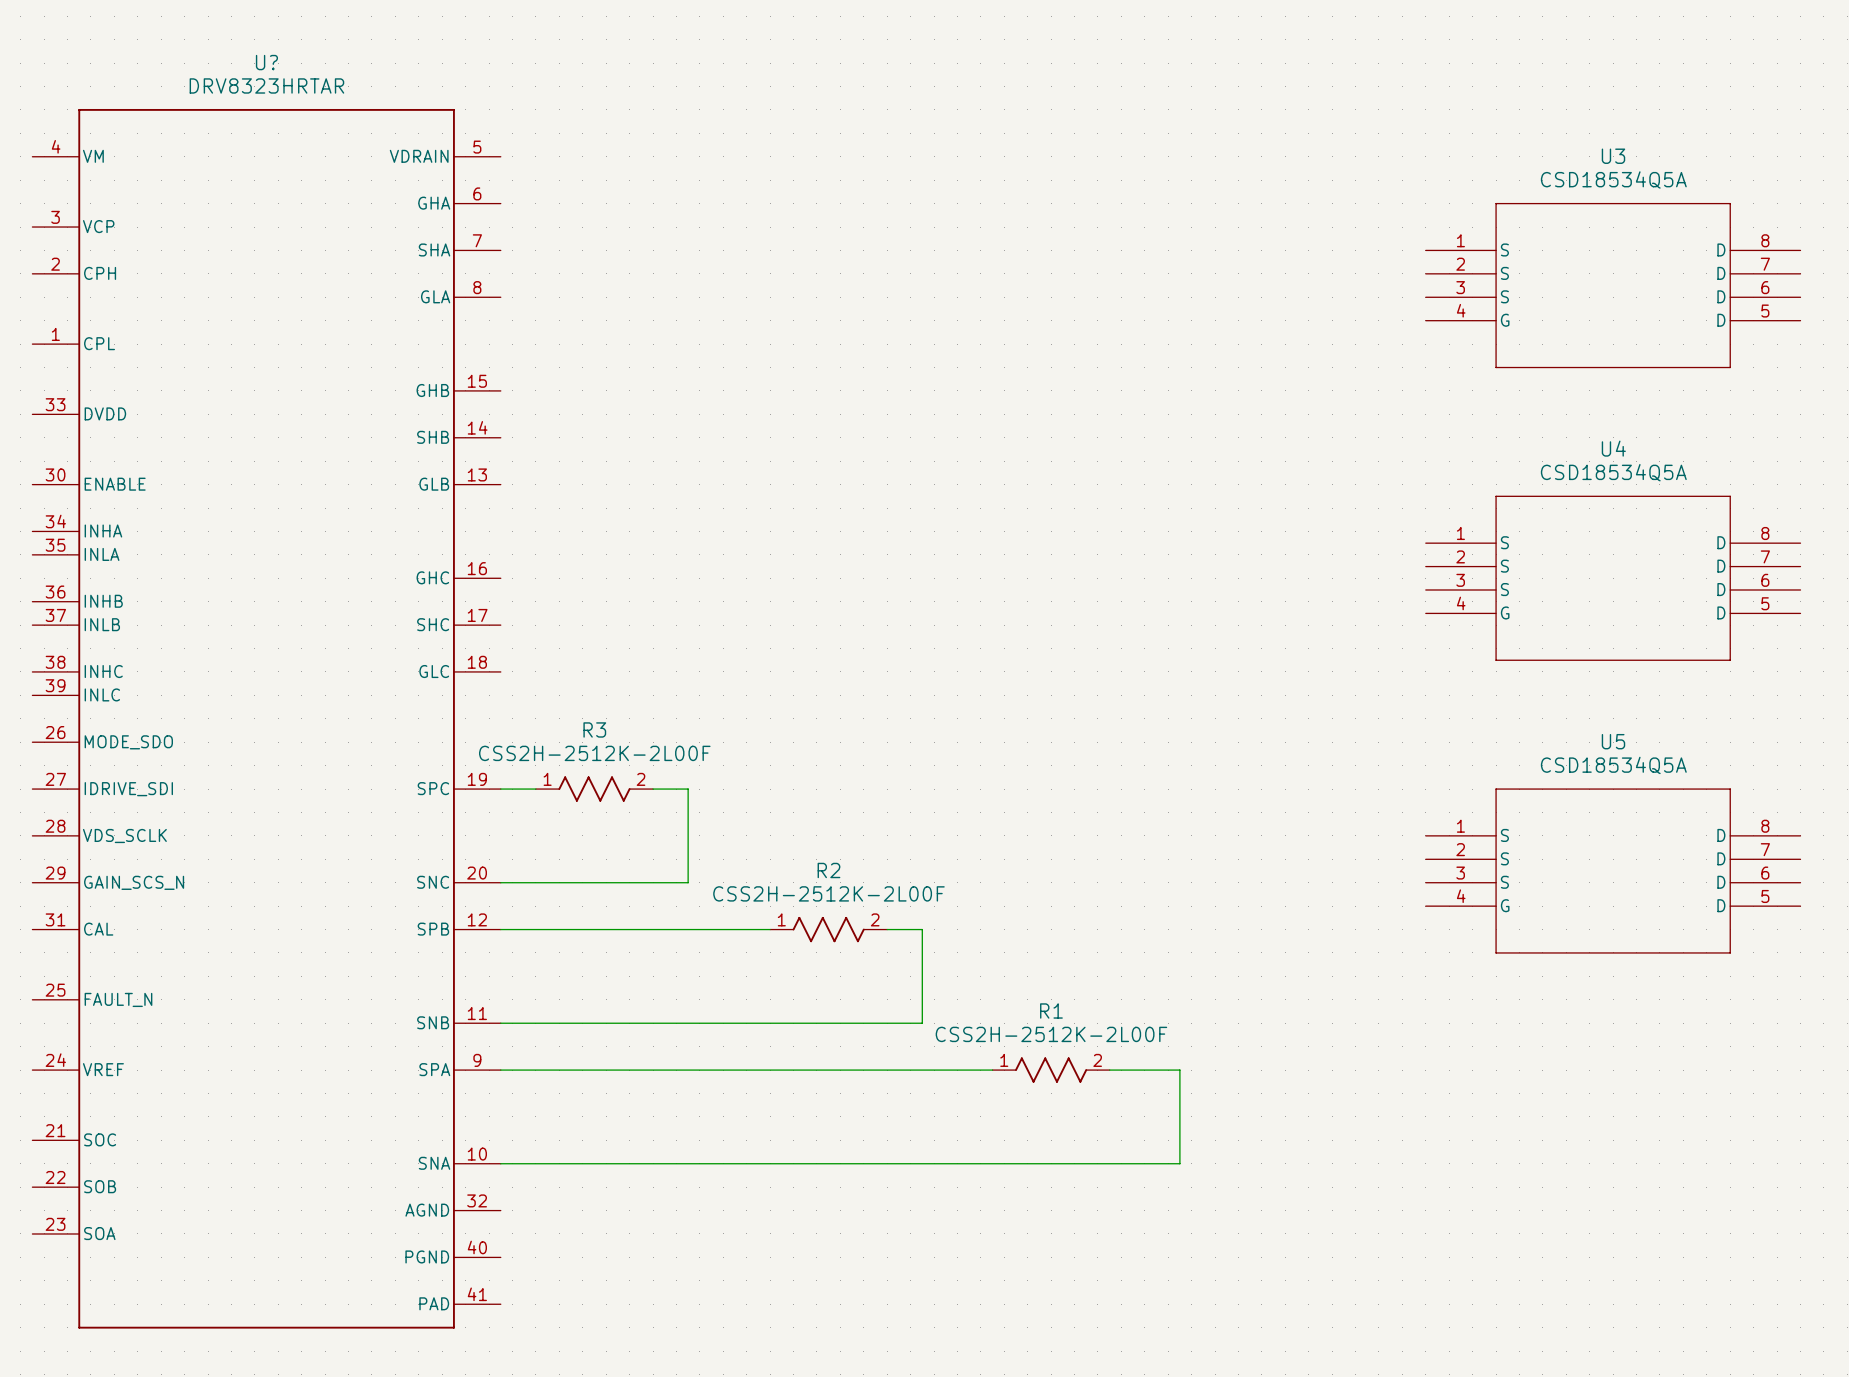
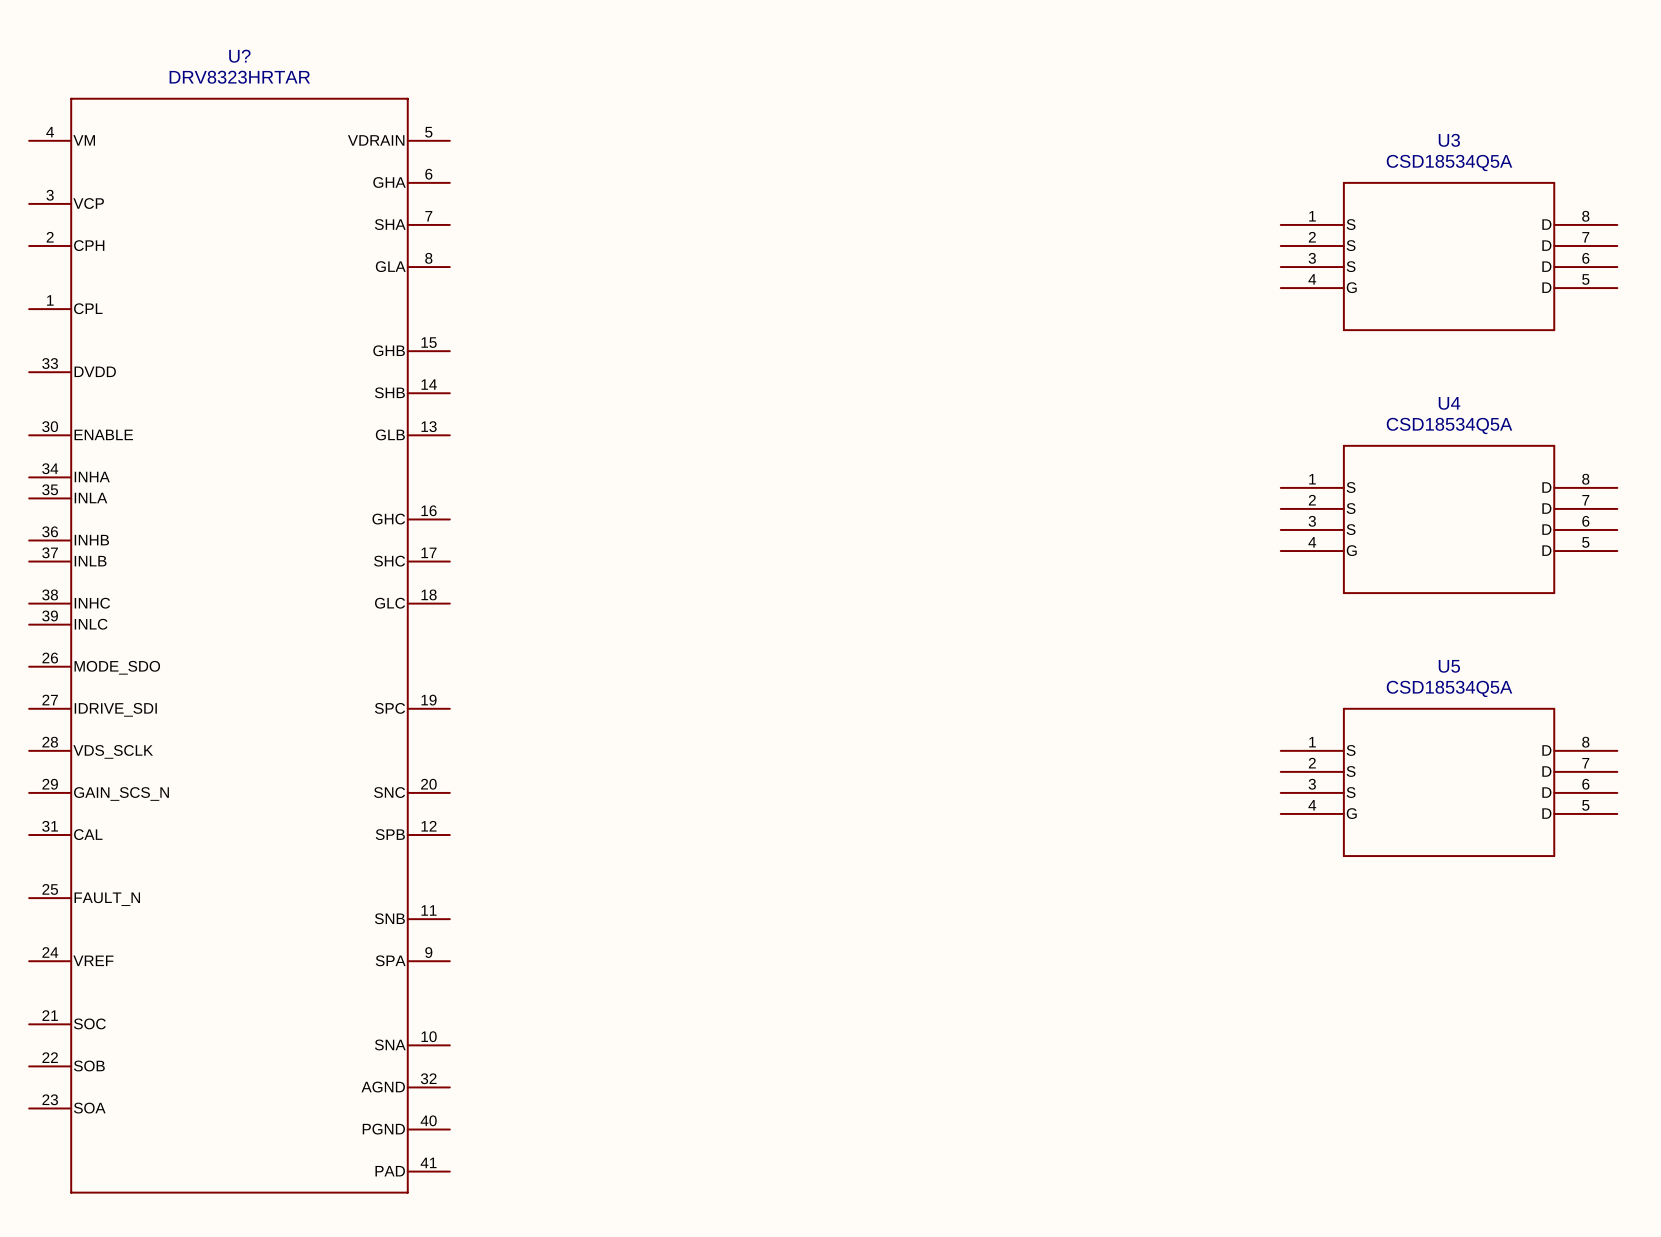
wire: (500, 789) (535, 789) -> none
R3: CSS2H-2512K-2L00F (594, 789) -> none
wire: (653, 789) (688, 789) (688, 882) (500, 882) -> none
wire: (500, 929) (770, 929) -> none
R2: CSS2H-2512K-2L00F (828, 929) -> none
wire: (887, 929) (922, 929) (922, 1023) (500, 1023) -> none
wire: (500, 1070) (992, 1070) -> none
R1: CSS2H-2512K-2L00F (1051, 1070) -> none
wire: (1109, 1070) (1179, 1070) (1179, 1163) (500, 1163) -> none

